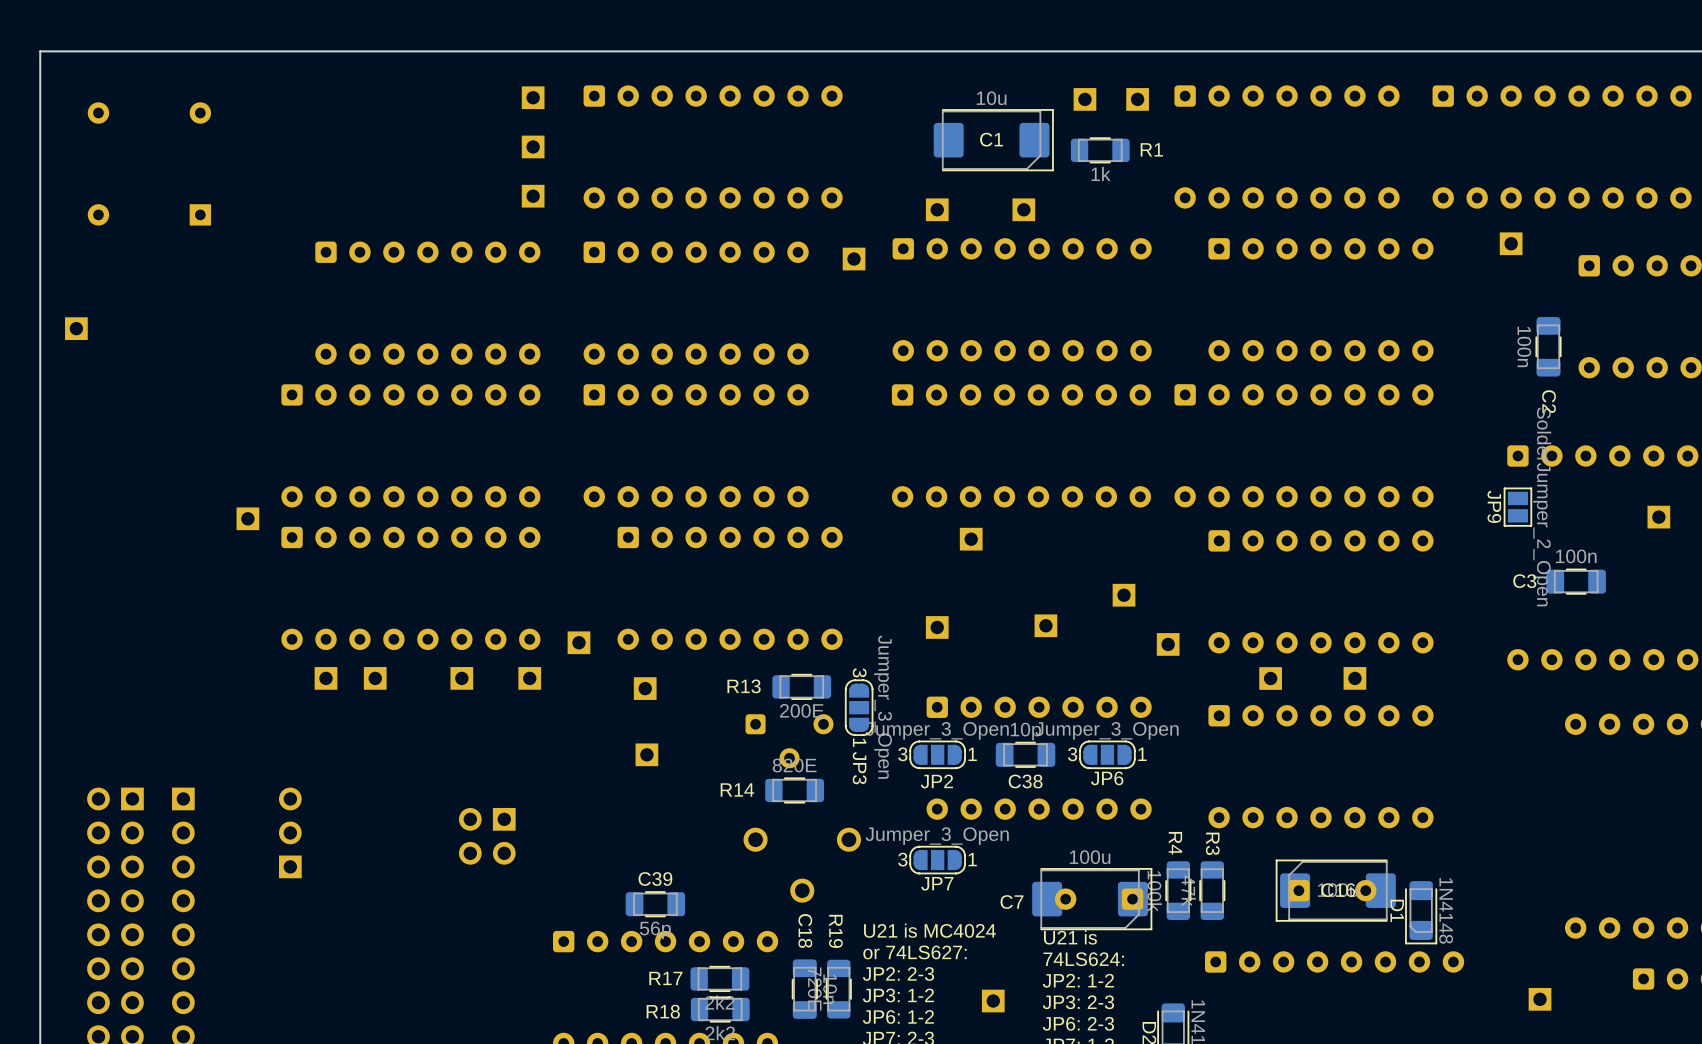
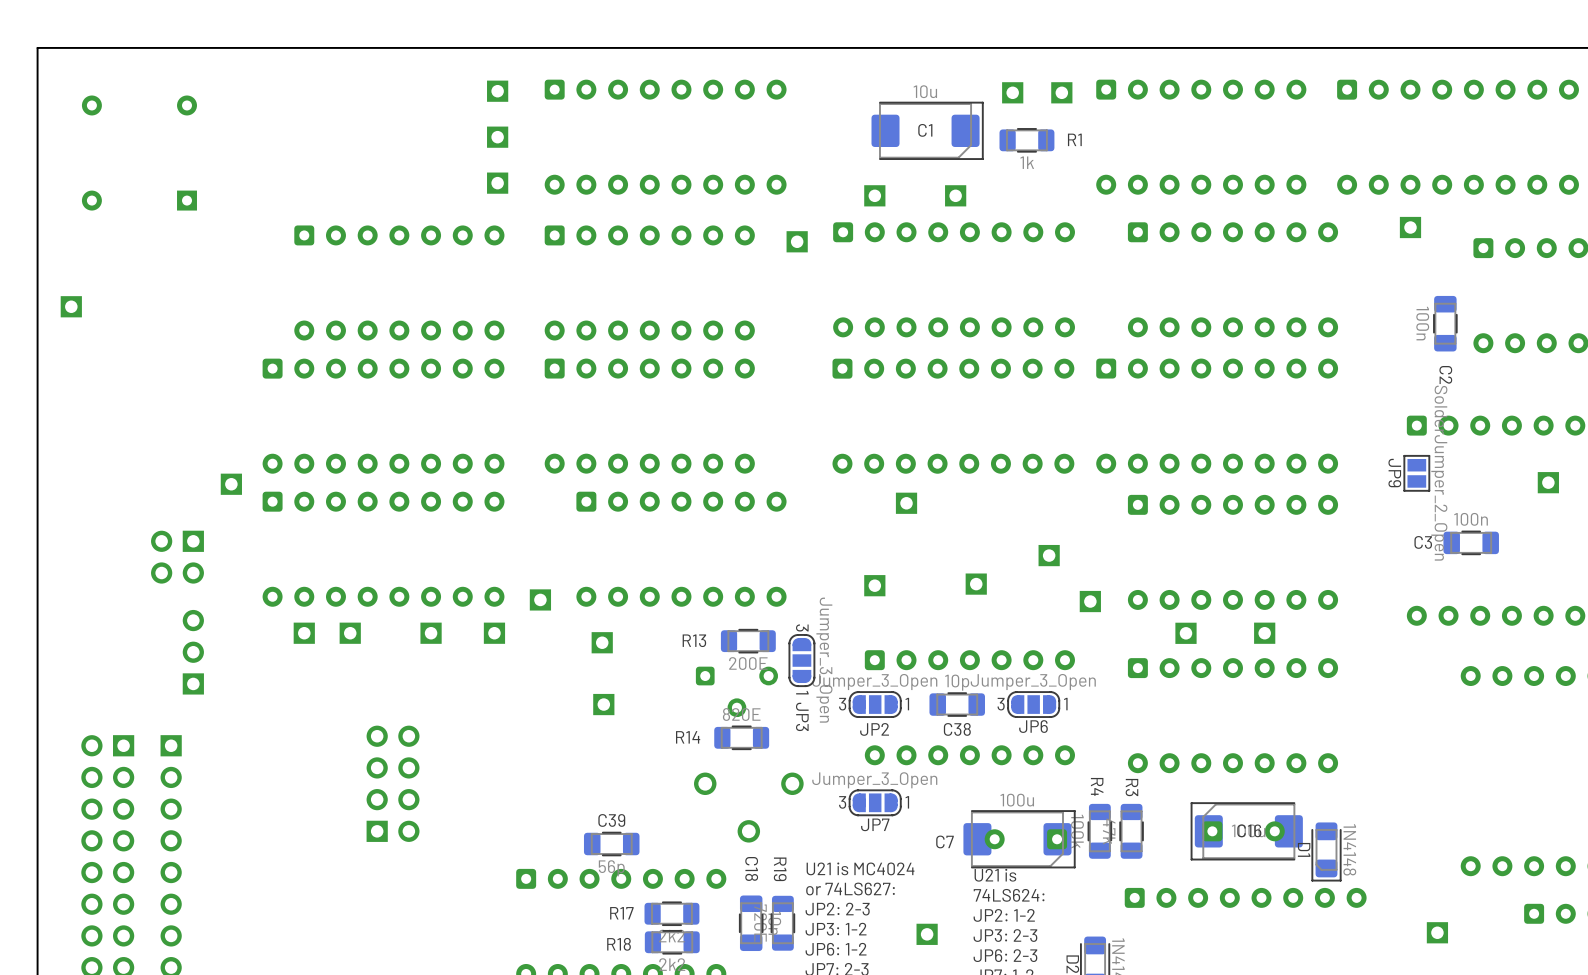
part: none -> (177, 557)
part position: (290, 832) -> (193, 652)
part: (487, 836) -> none
part: none -> (393, 783)

